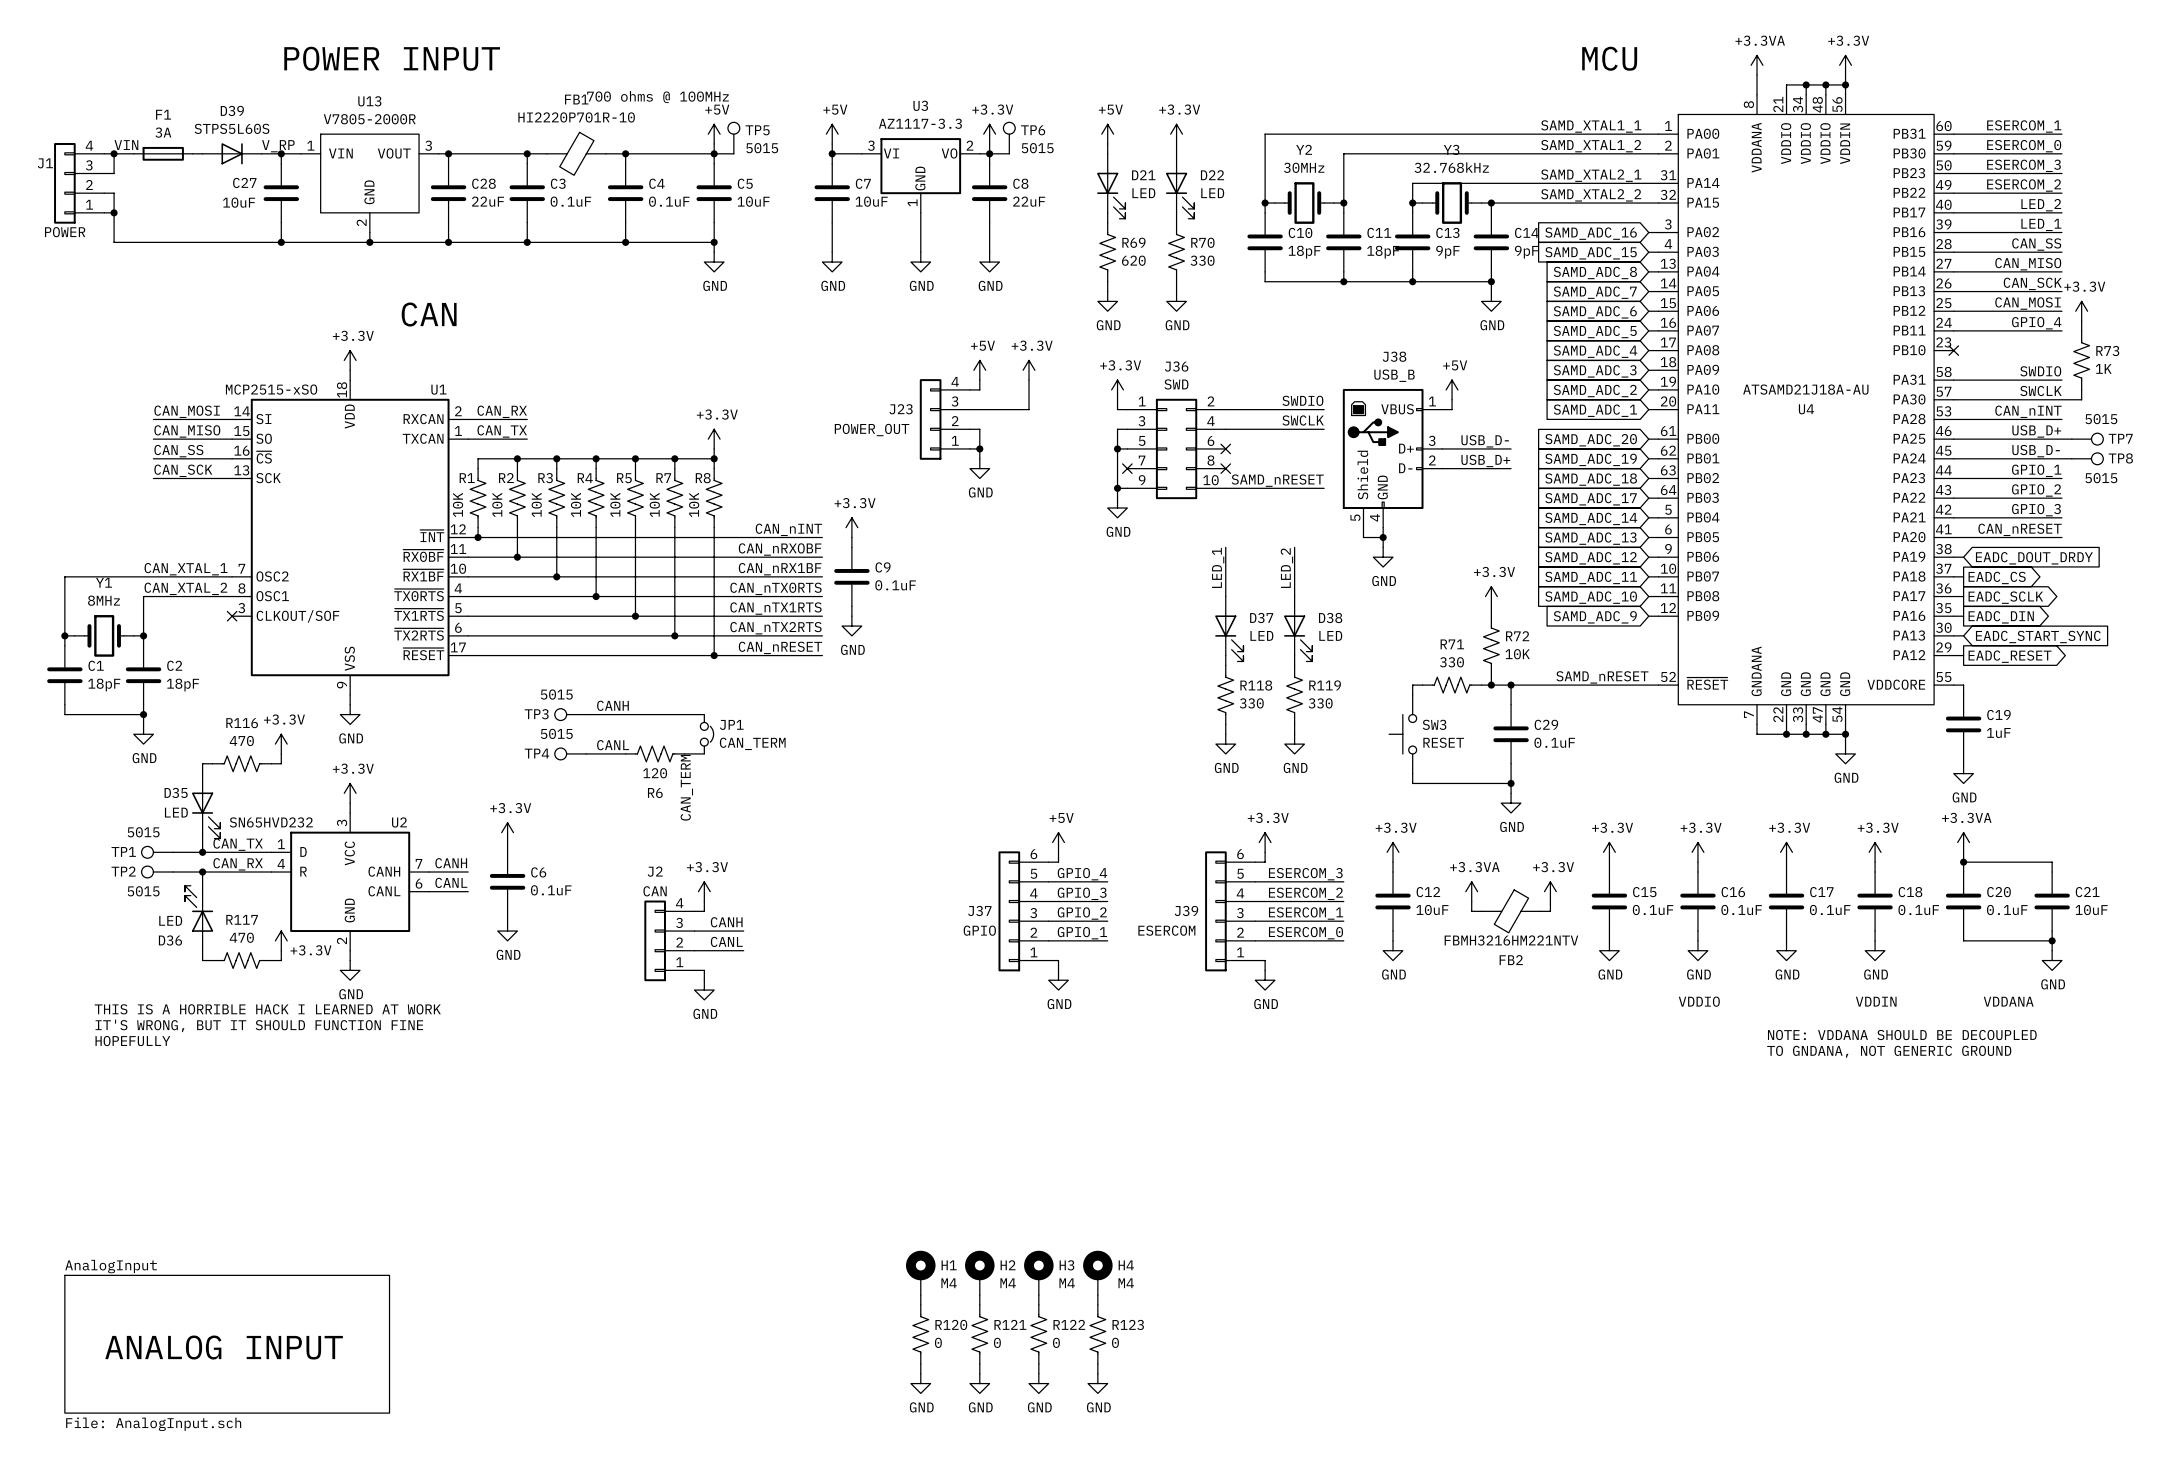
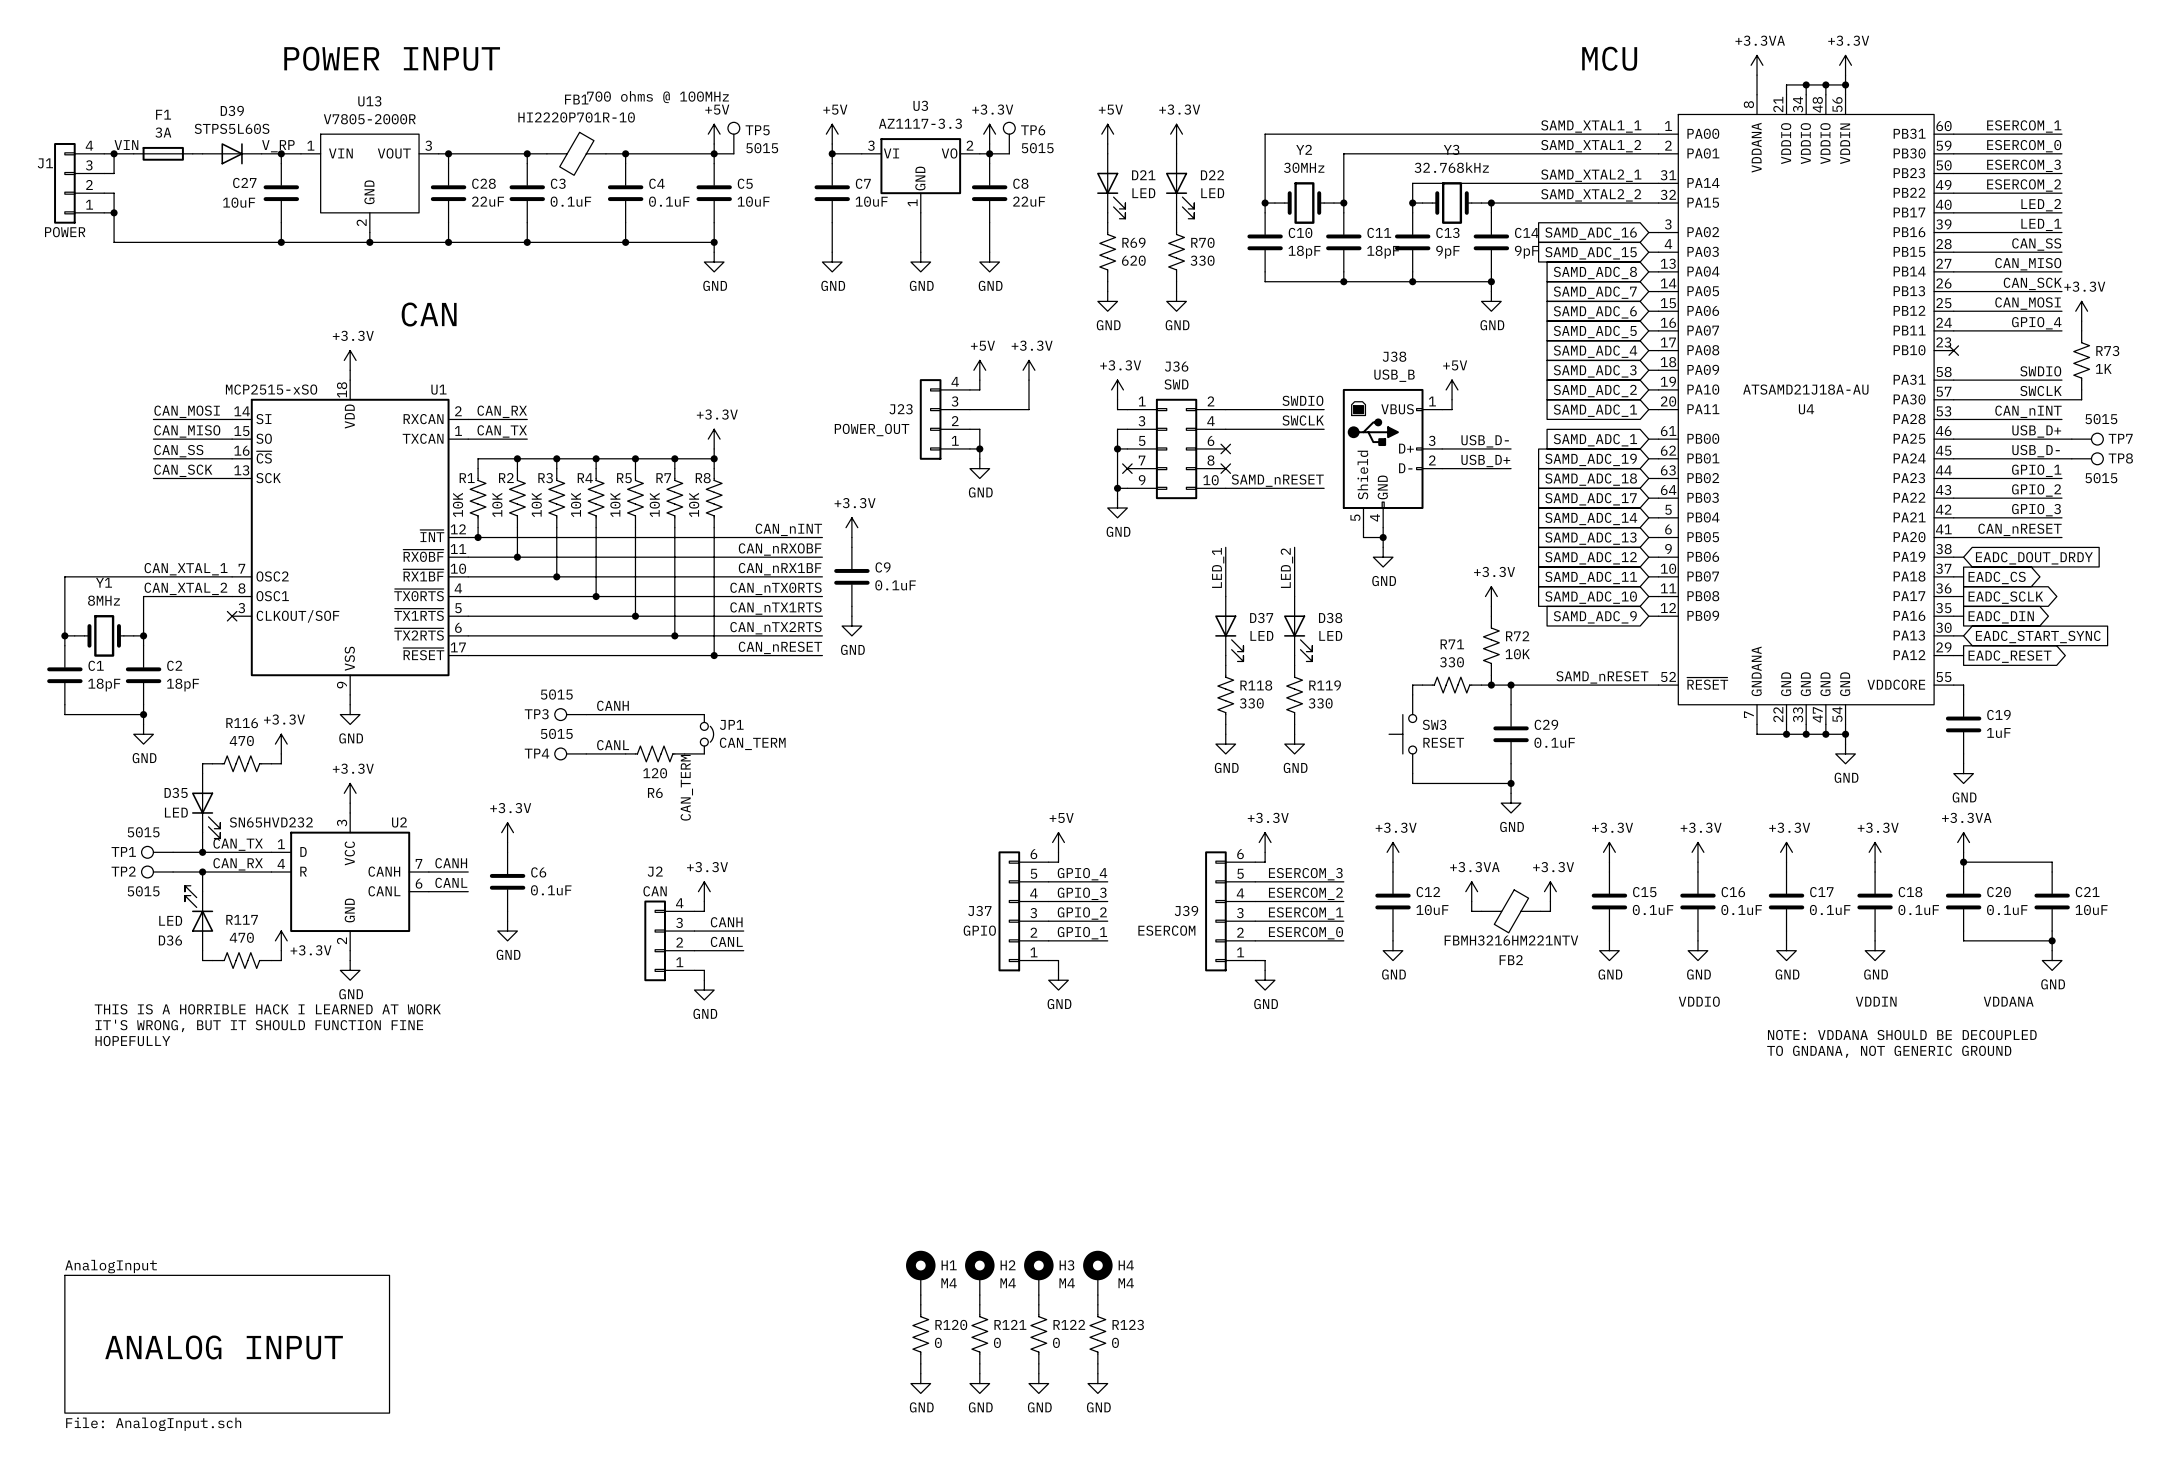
global label: SAMD_ADC_20 (1591, 440) -> SAMD_ADC_1 (1595, 440)

